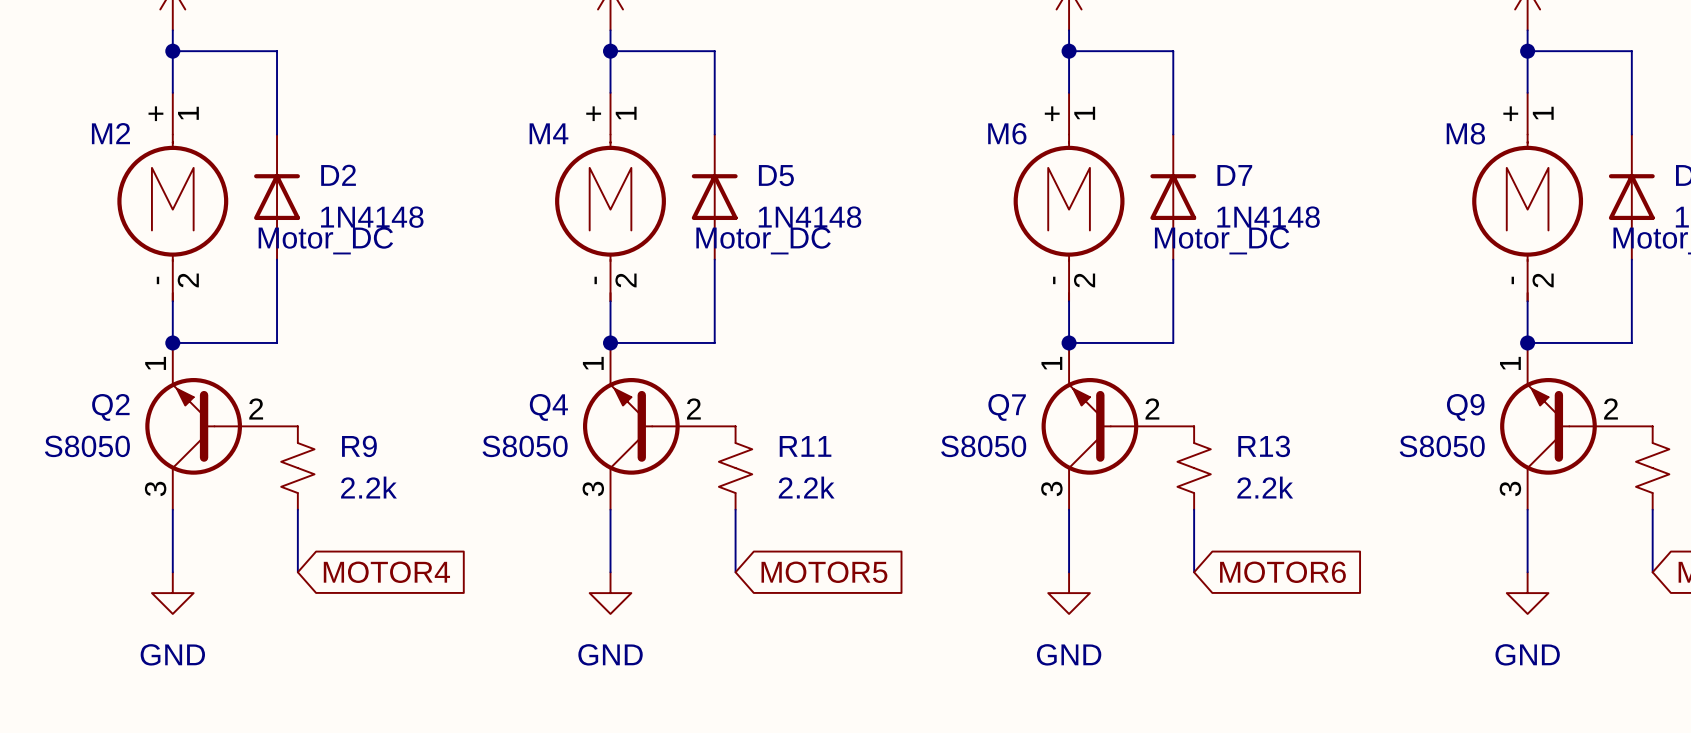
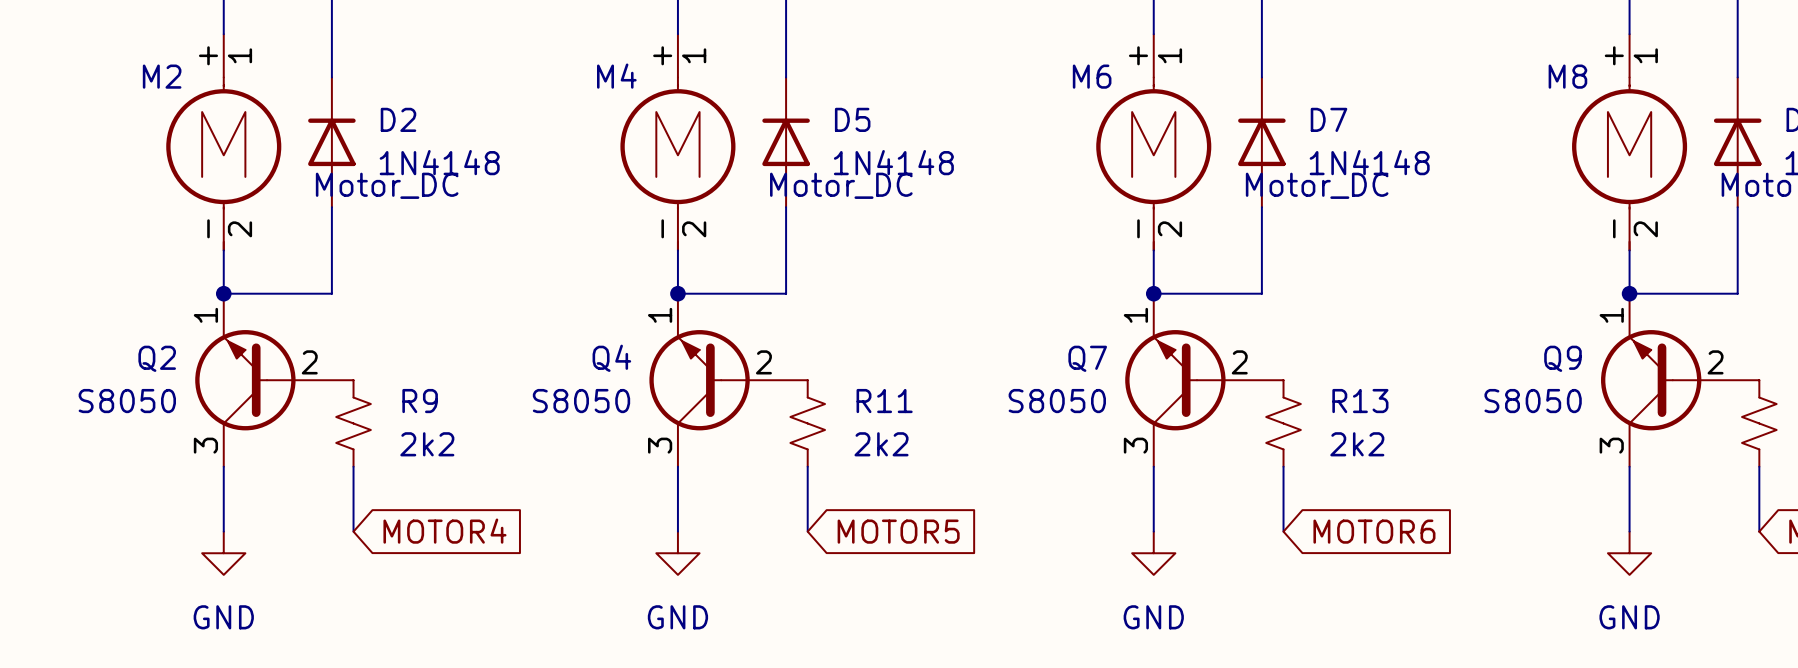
R9 value: 2.2k (368, 487) -> 2k2 (427, 444)
R11 value: 2.2k (806, 487) -> 2k2 (881, 444)
R13 value: 2.2k (1265, 487) -> 2k2 (1357, 444)

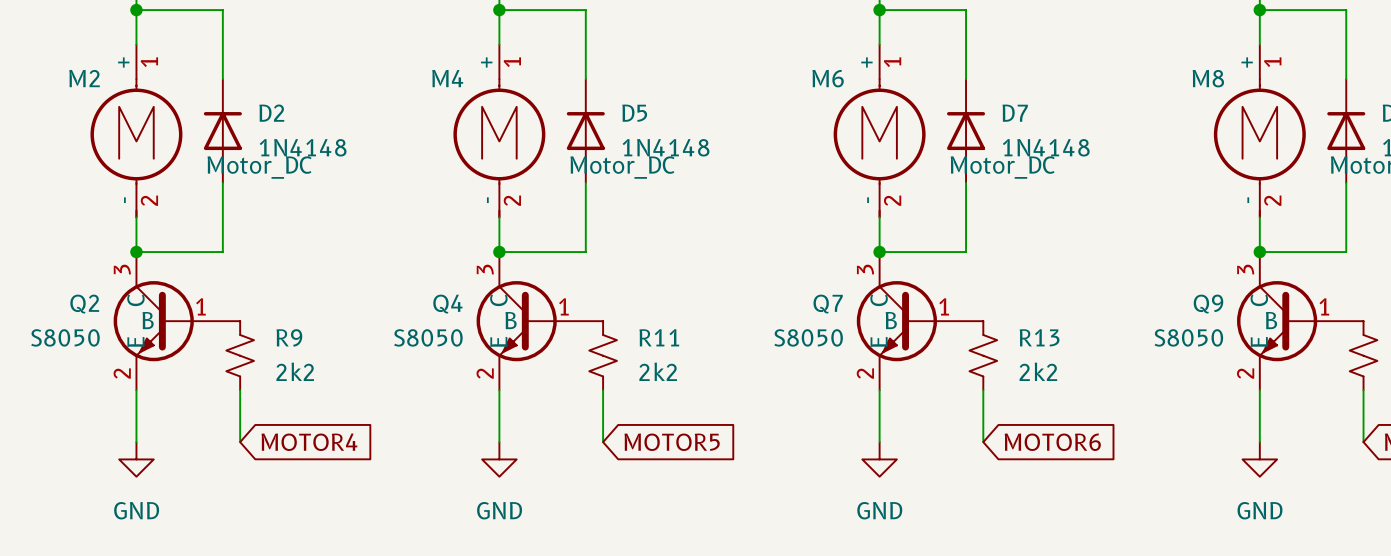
Q2 symbol: [195, 293, 354, 467] -> [113, 252, 241, 391]
Q4 symbol: [649, 293, 808, 467] -> [476, 252, 604, 391]
Q7 symbol: [1125, 293, 1284, 467] -> [856, 252, 984, 391]
Q9 symbol: [1601, 293, 1760, 467] -> [1237, 252, 1364, 391]

